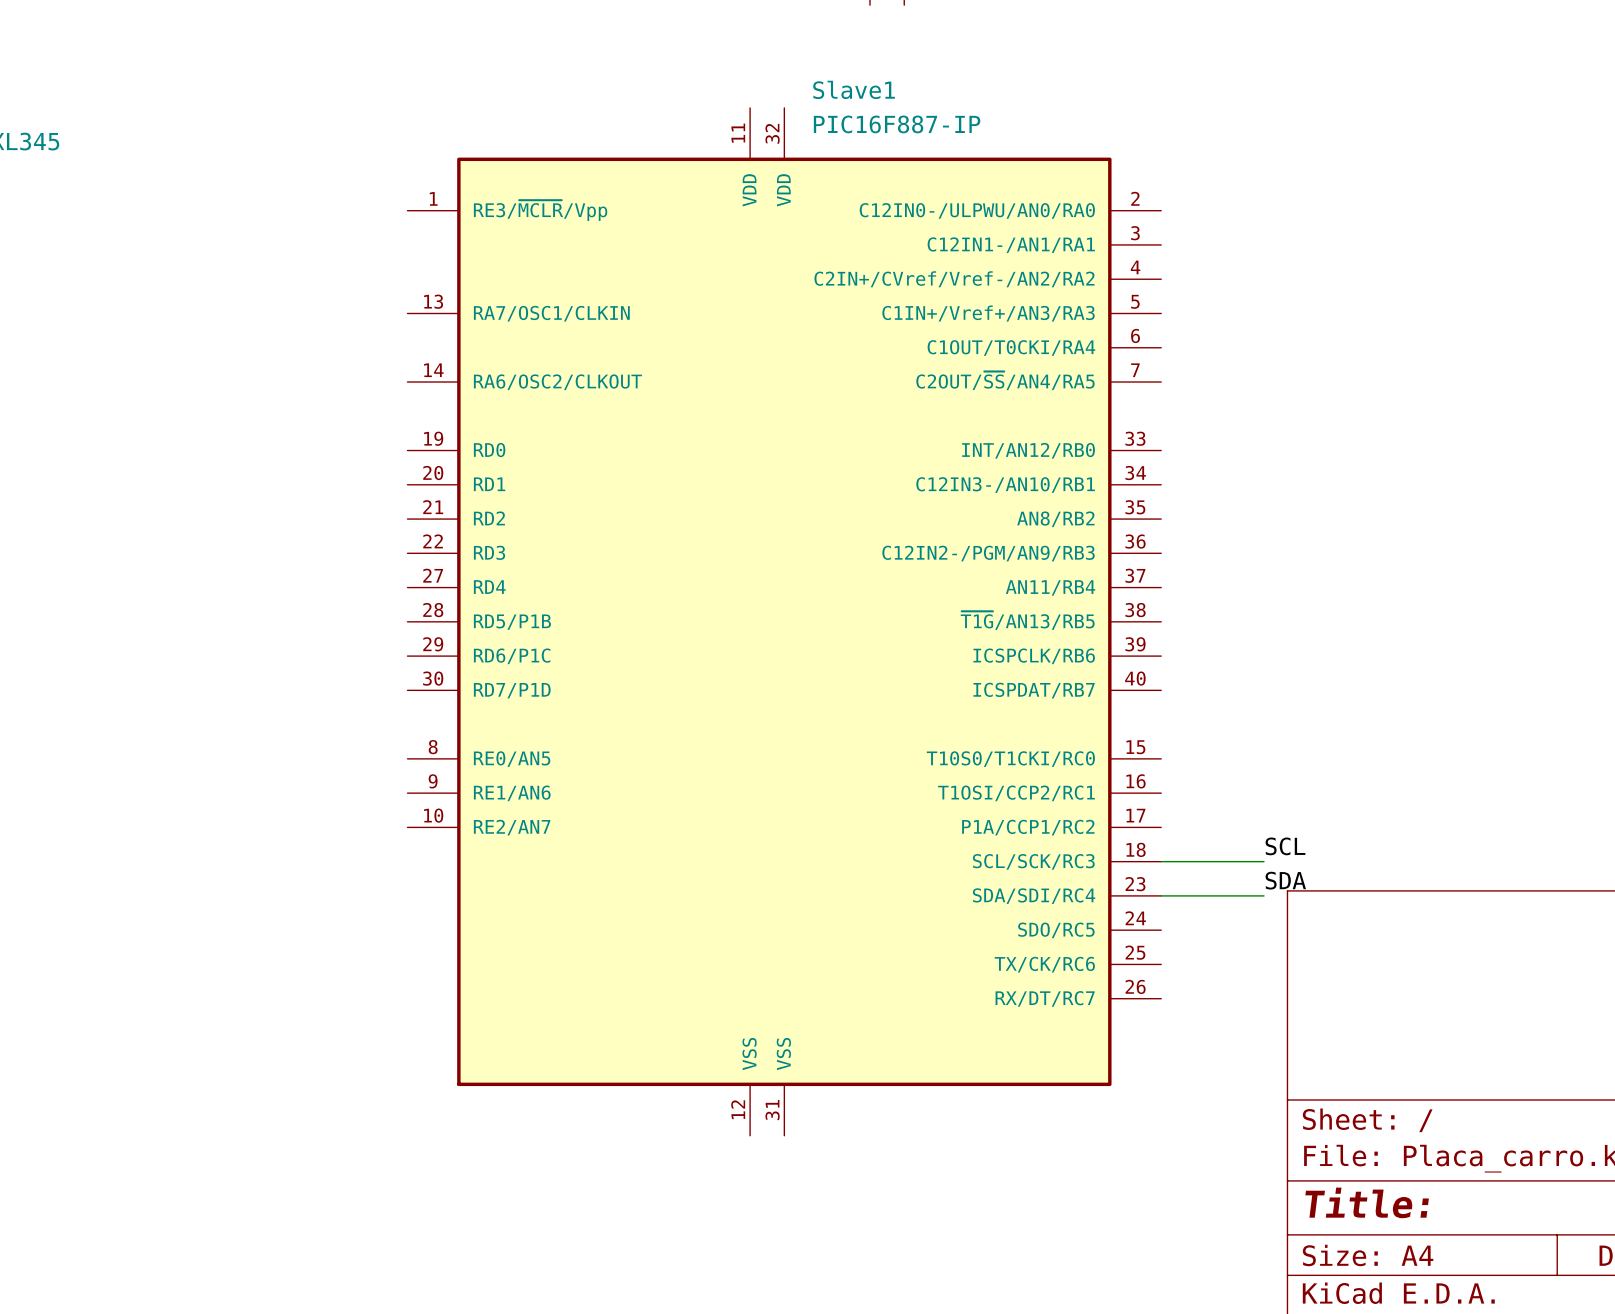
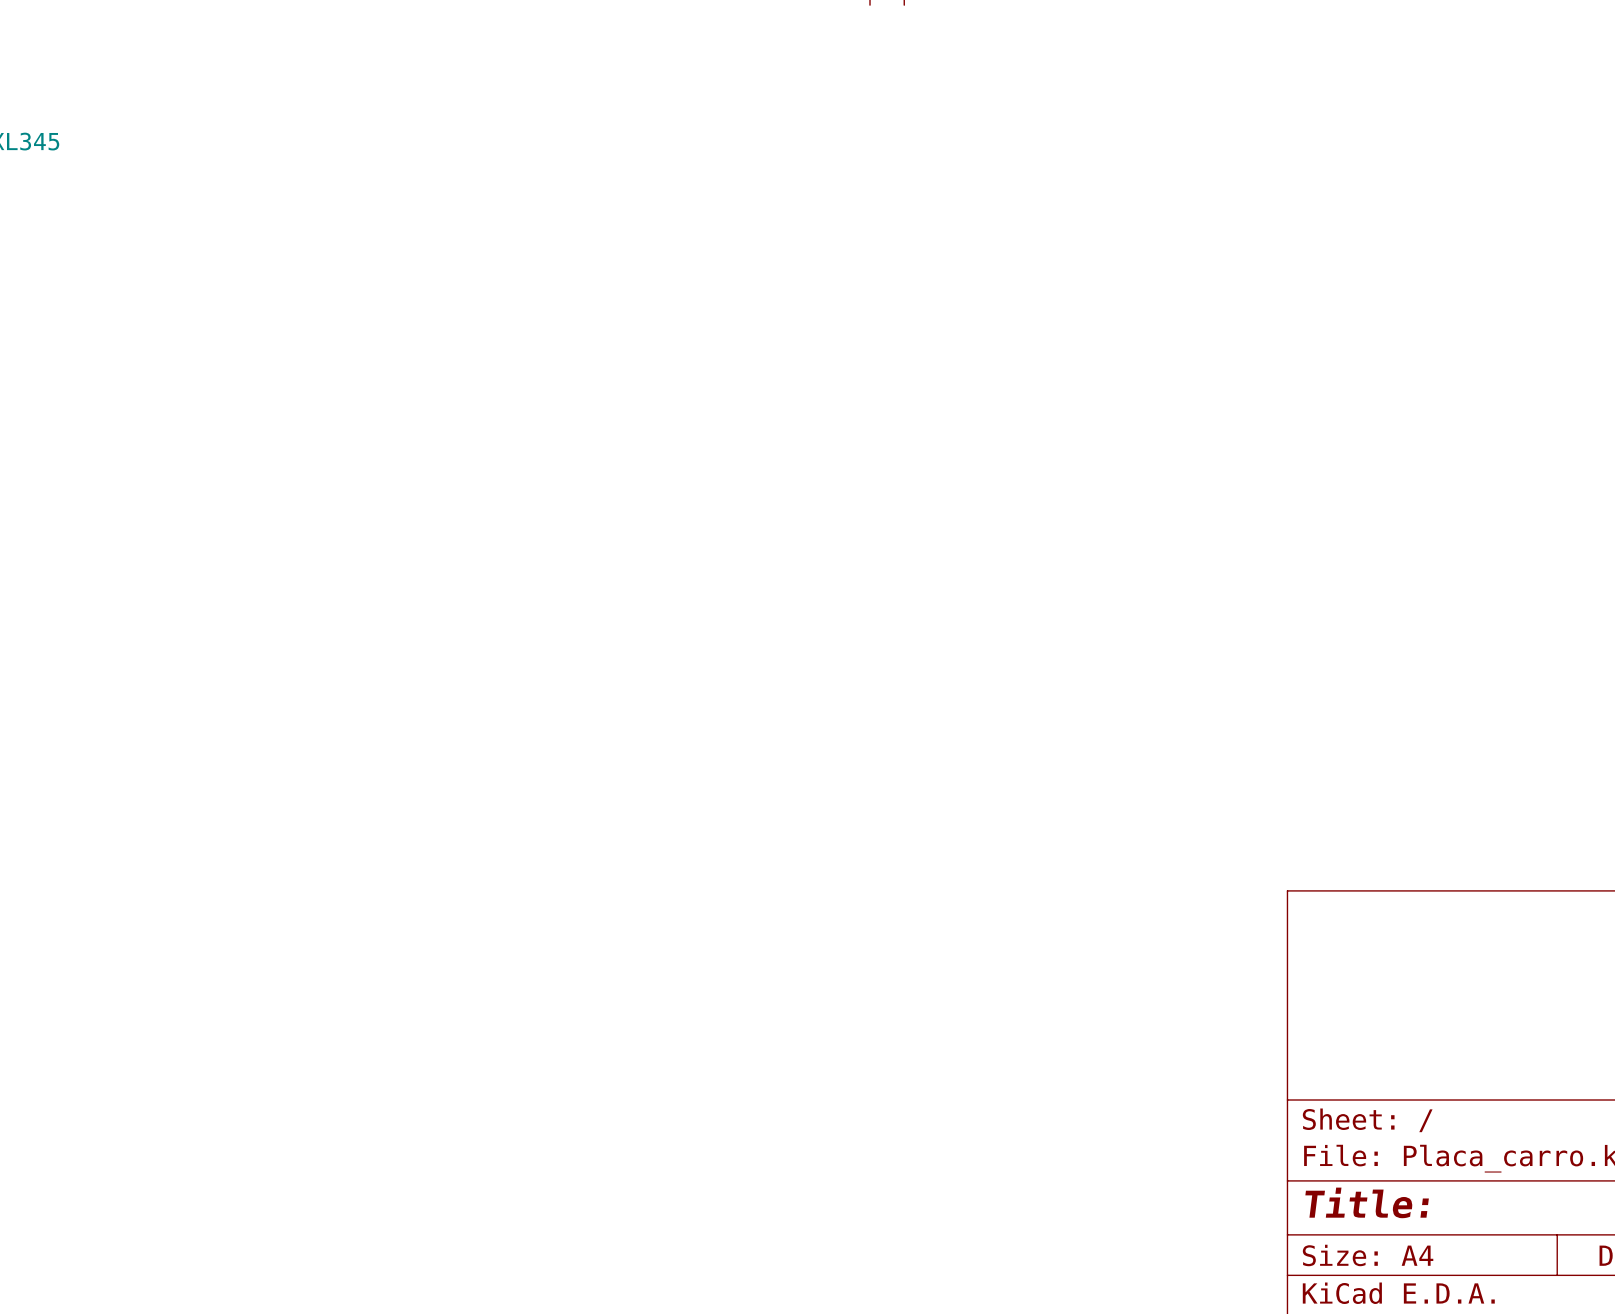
Slave1: PIC16F887-IP (784, 621) -> none
label: SCL (1285, 846) -> none
wire: (1161, 861) (1263, 861) -> none
label: SDA (1285, 880) -> none
wire: (1161, 895) (1263, 895) -> none

